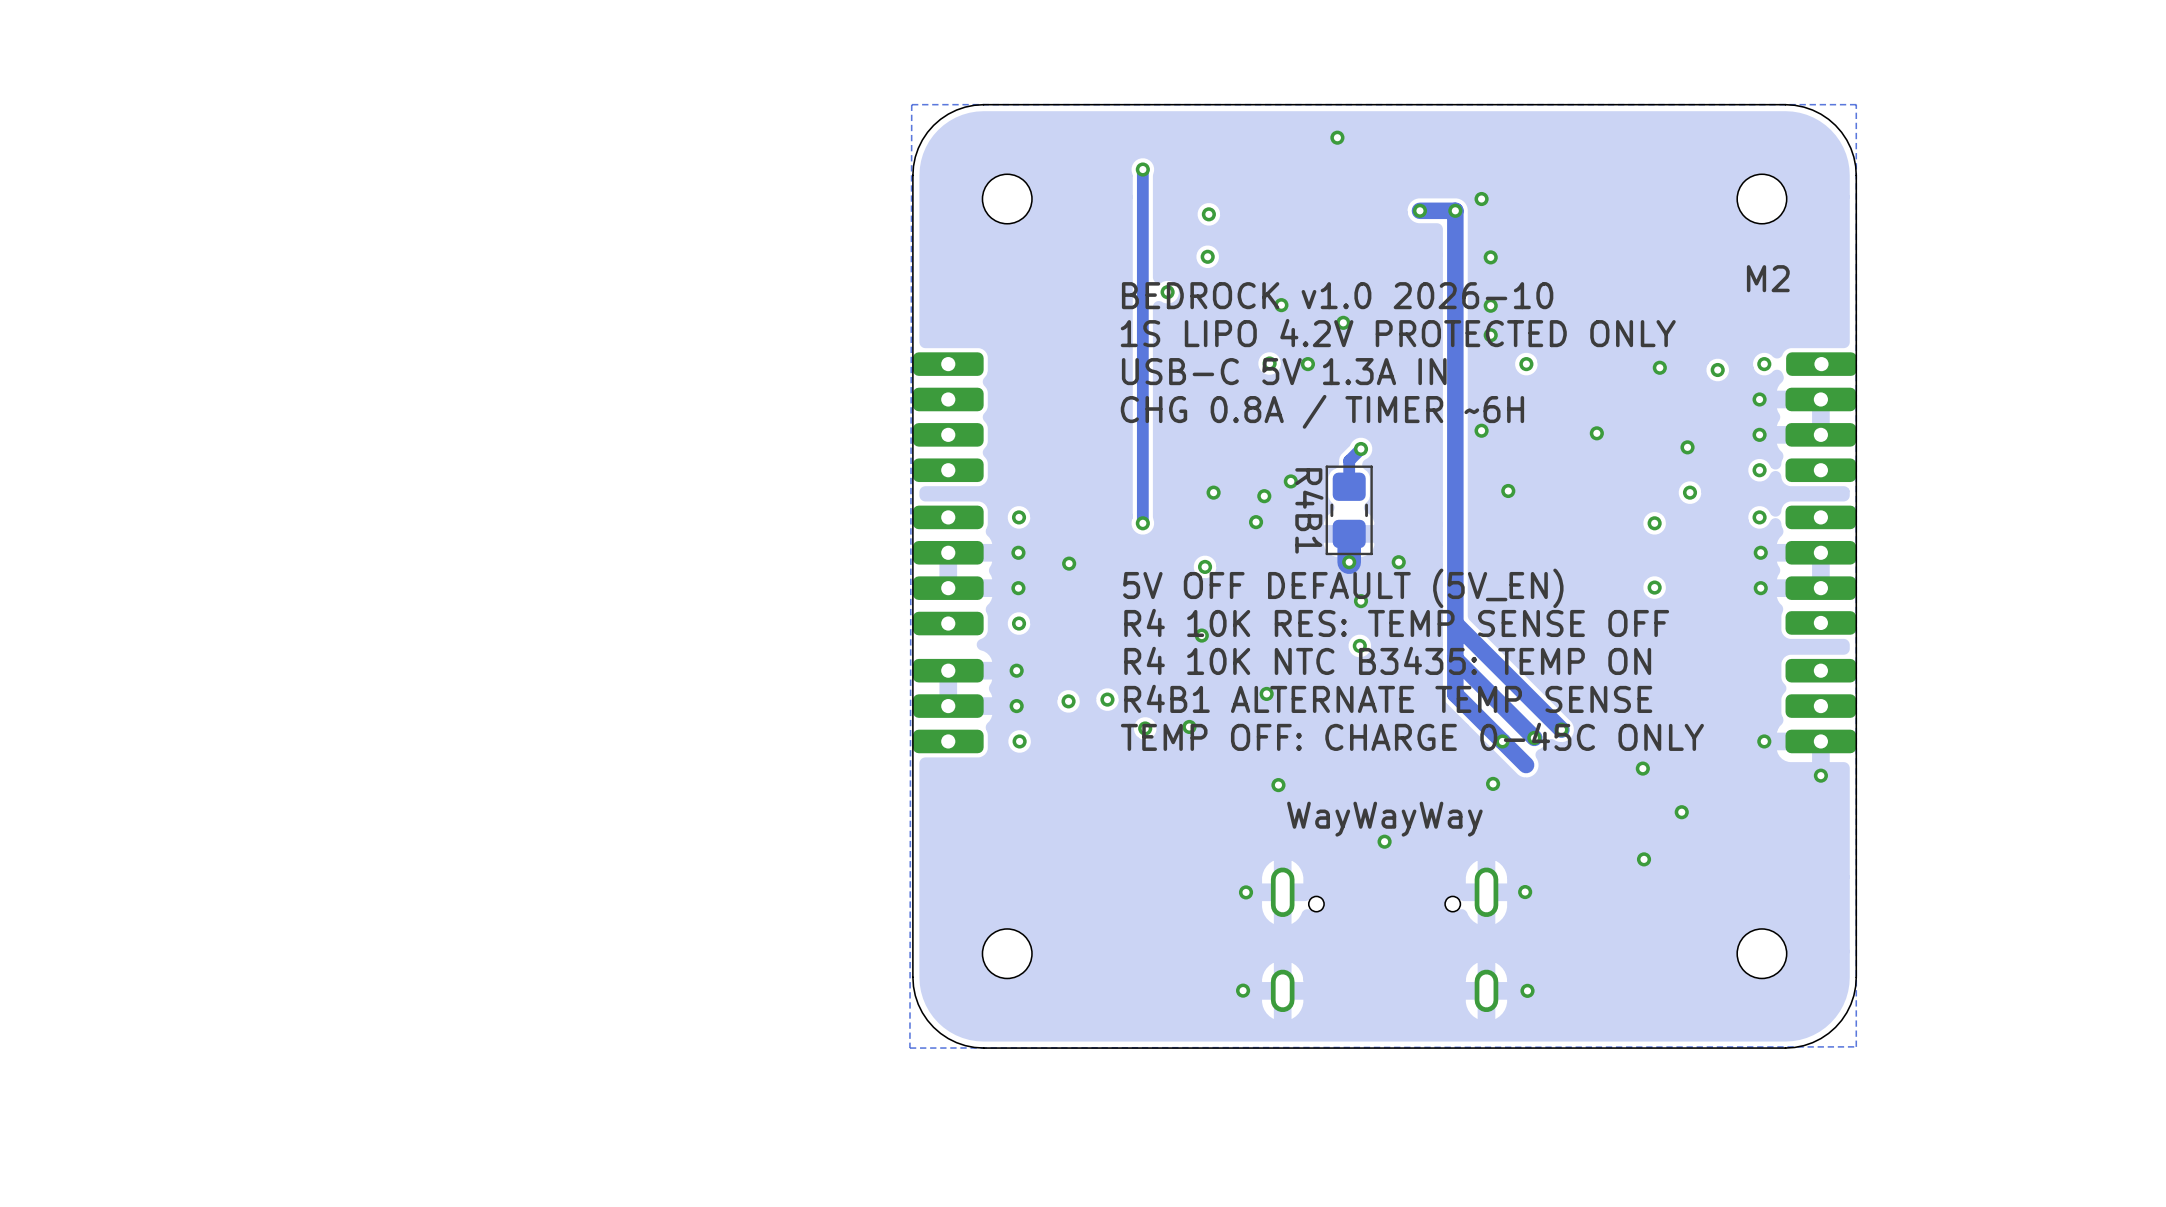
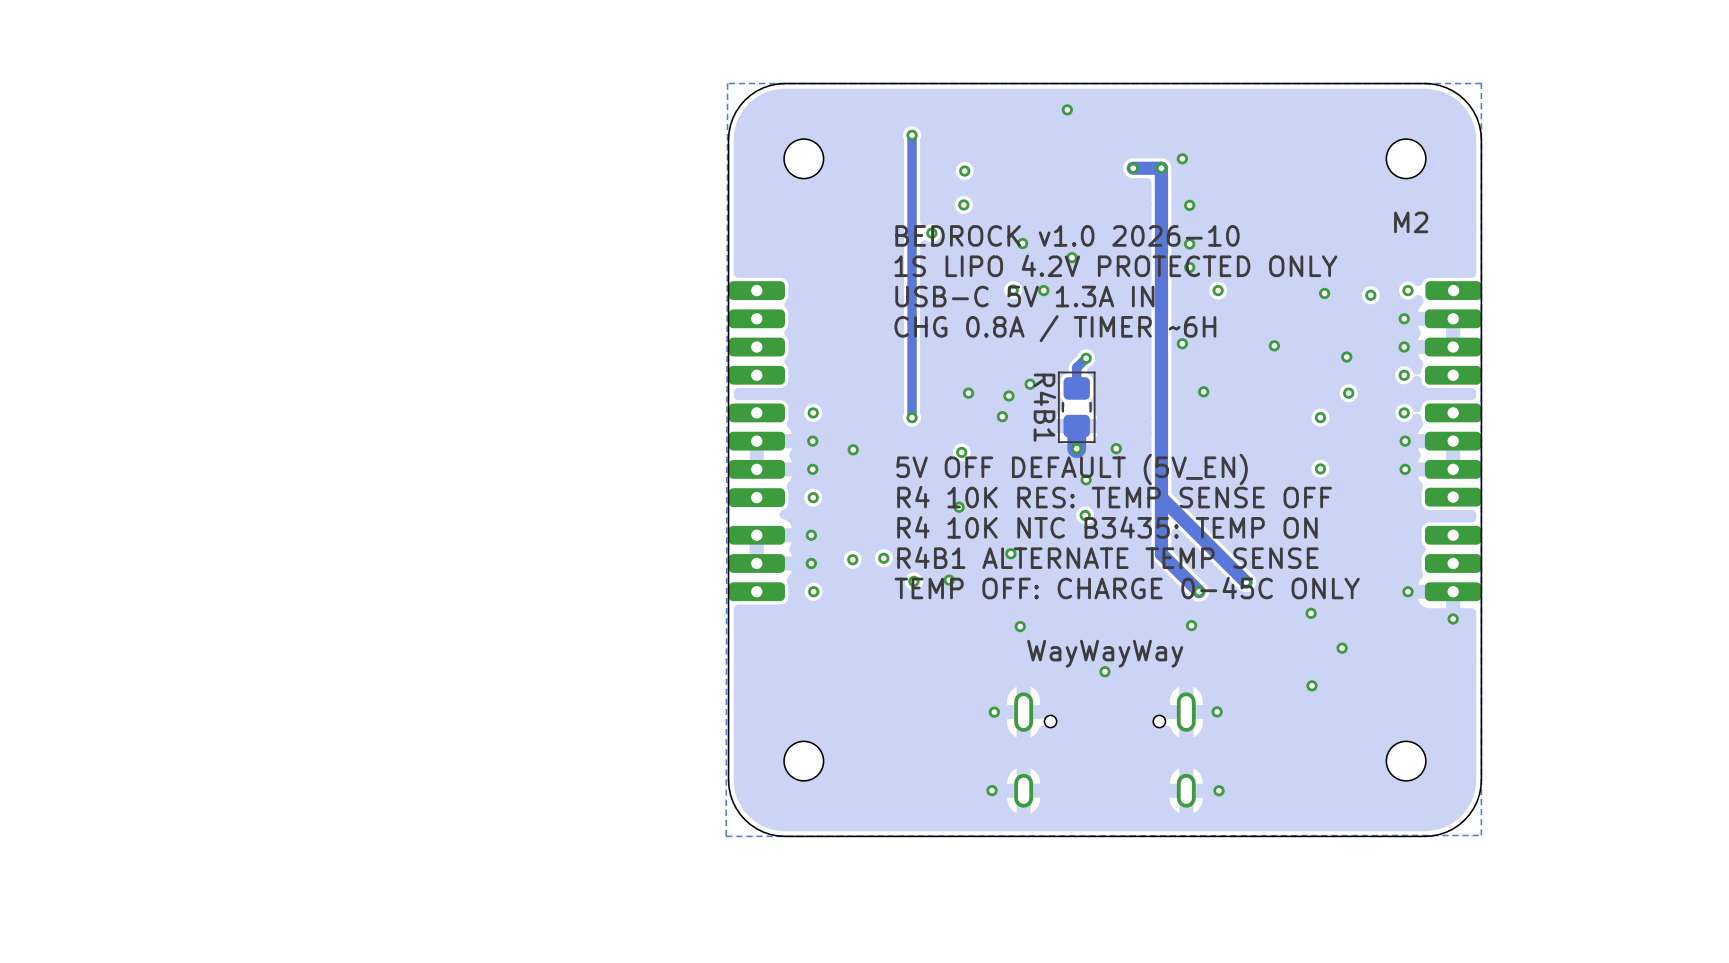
track: (1455, 658) (1534, 737) -> none
via: (1534, 737) -> none
track: (1502, 741) (1526, 765) -> none

